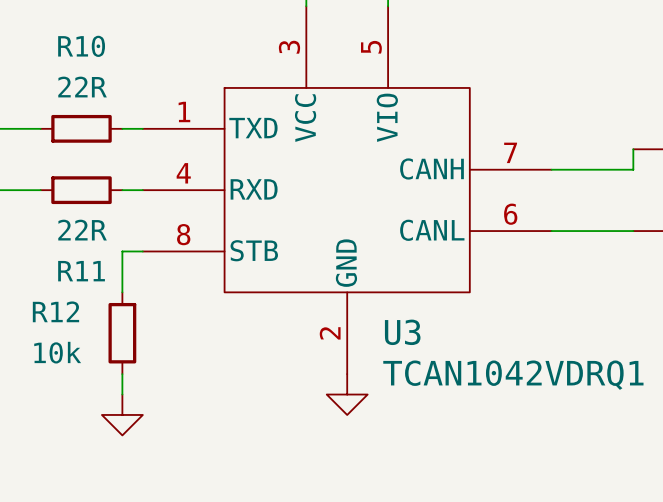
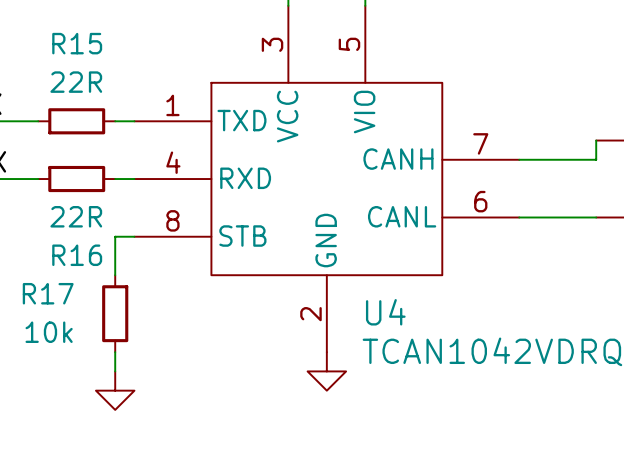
R10 name: R10 (81, 46) -> R15 (77, 43)
R11 name: R11 (81, 271) -> R16 (77, 255)
R12 name: R12 (55, 311) -> R17 (48, 293)
U3 name: U3 (402, 332) -> U4 (385, 312)

